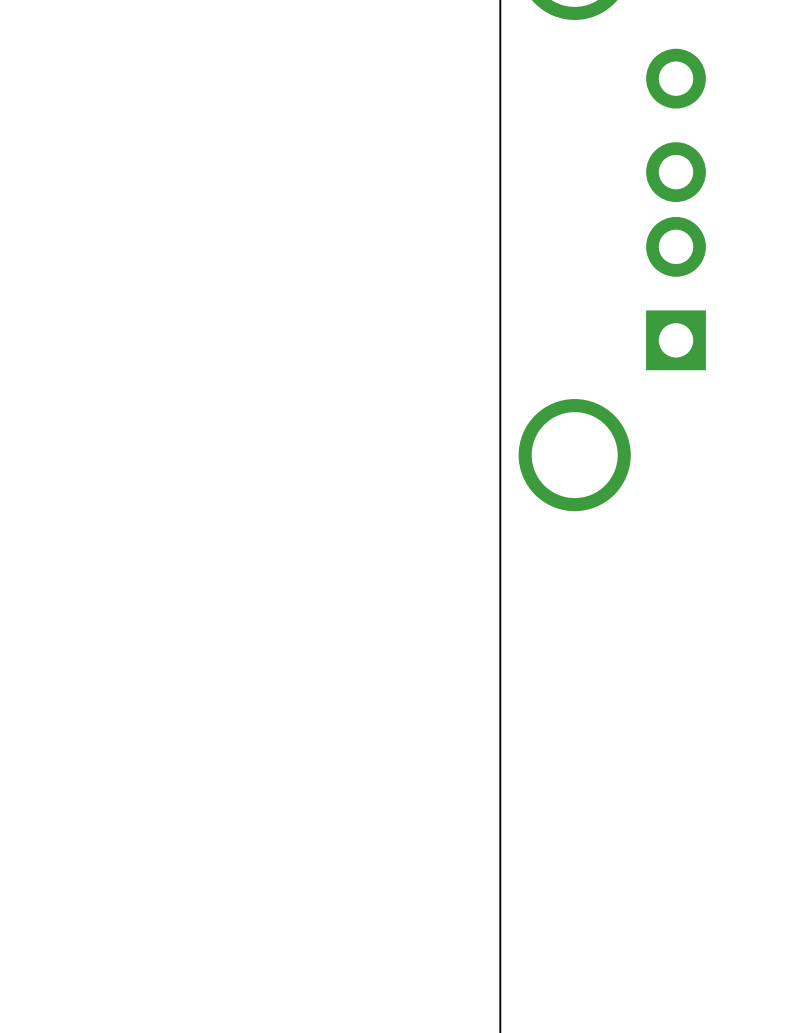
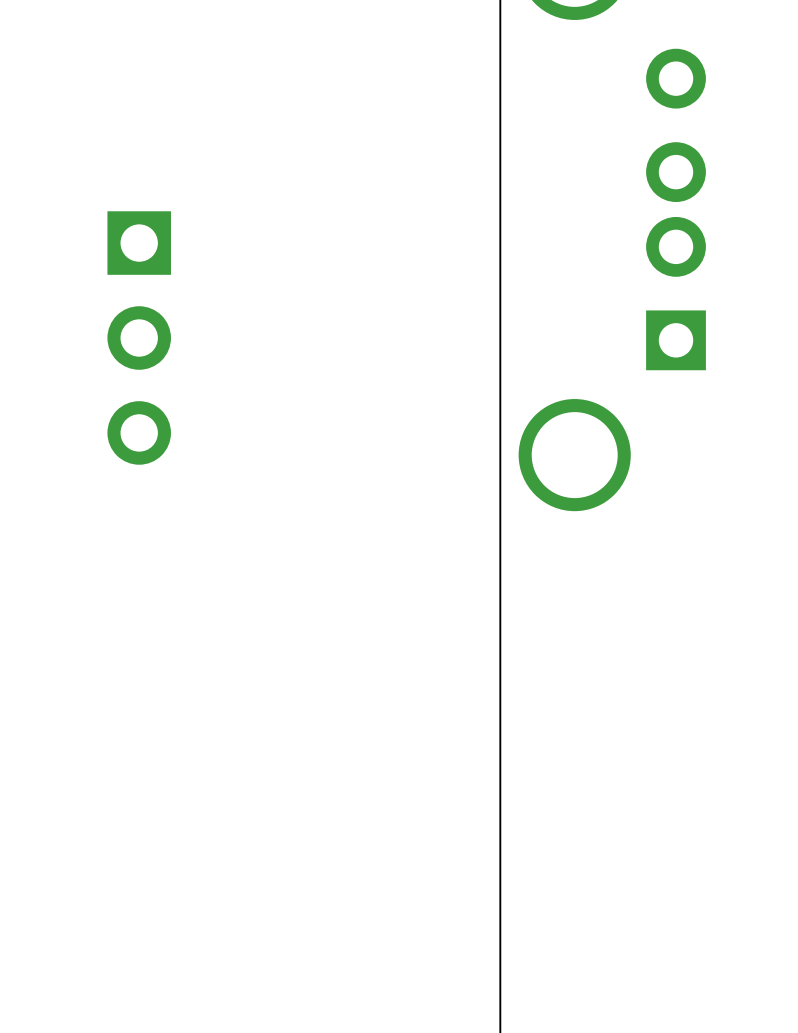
part: none -> (139, 338)

